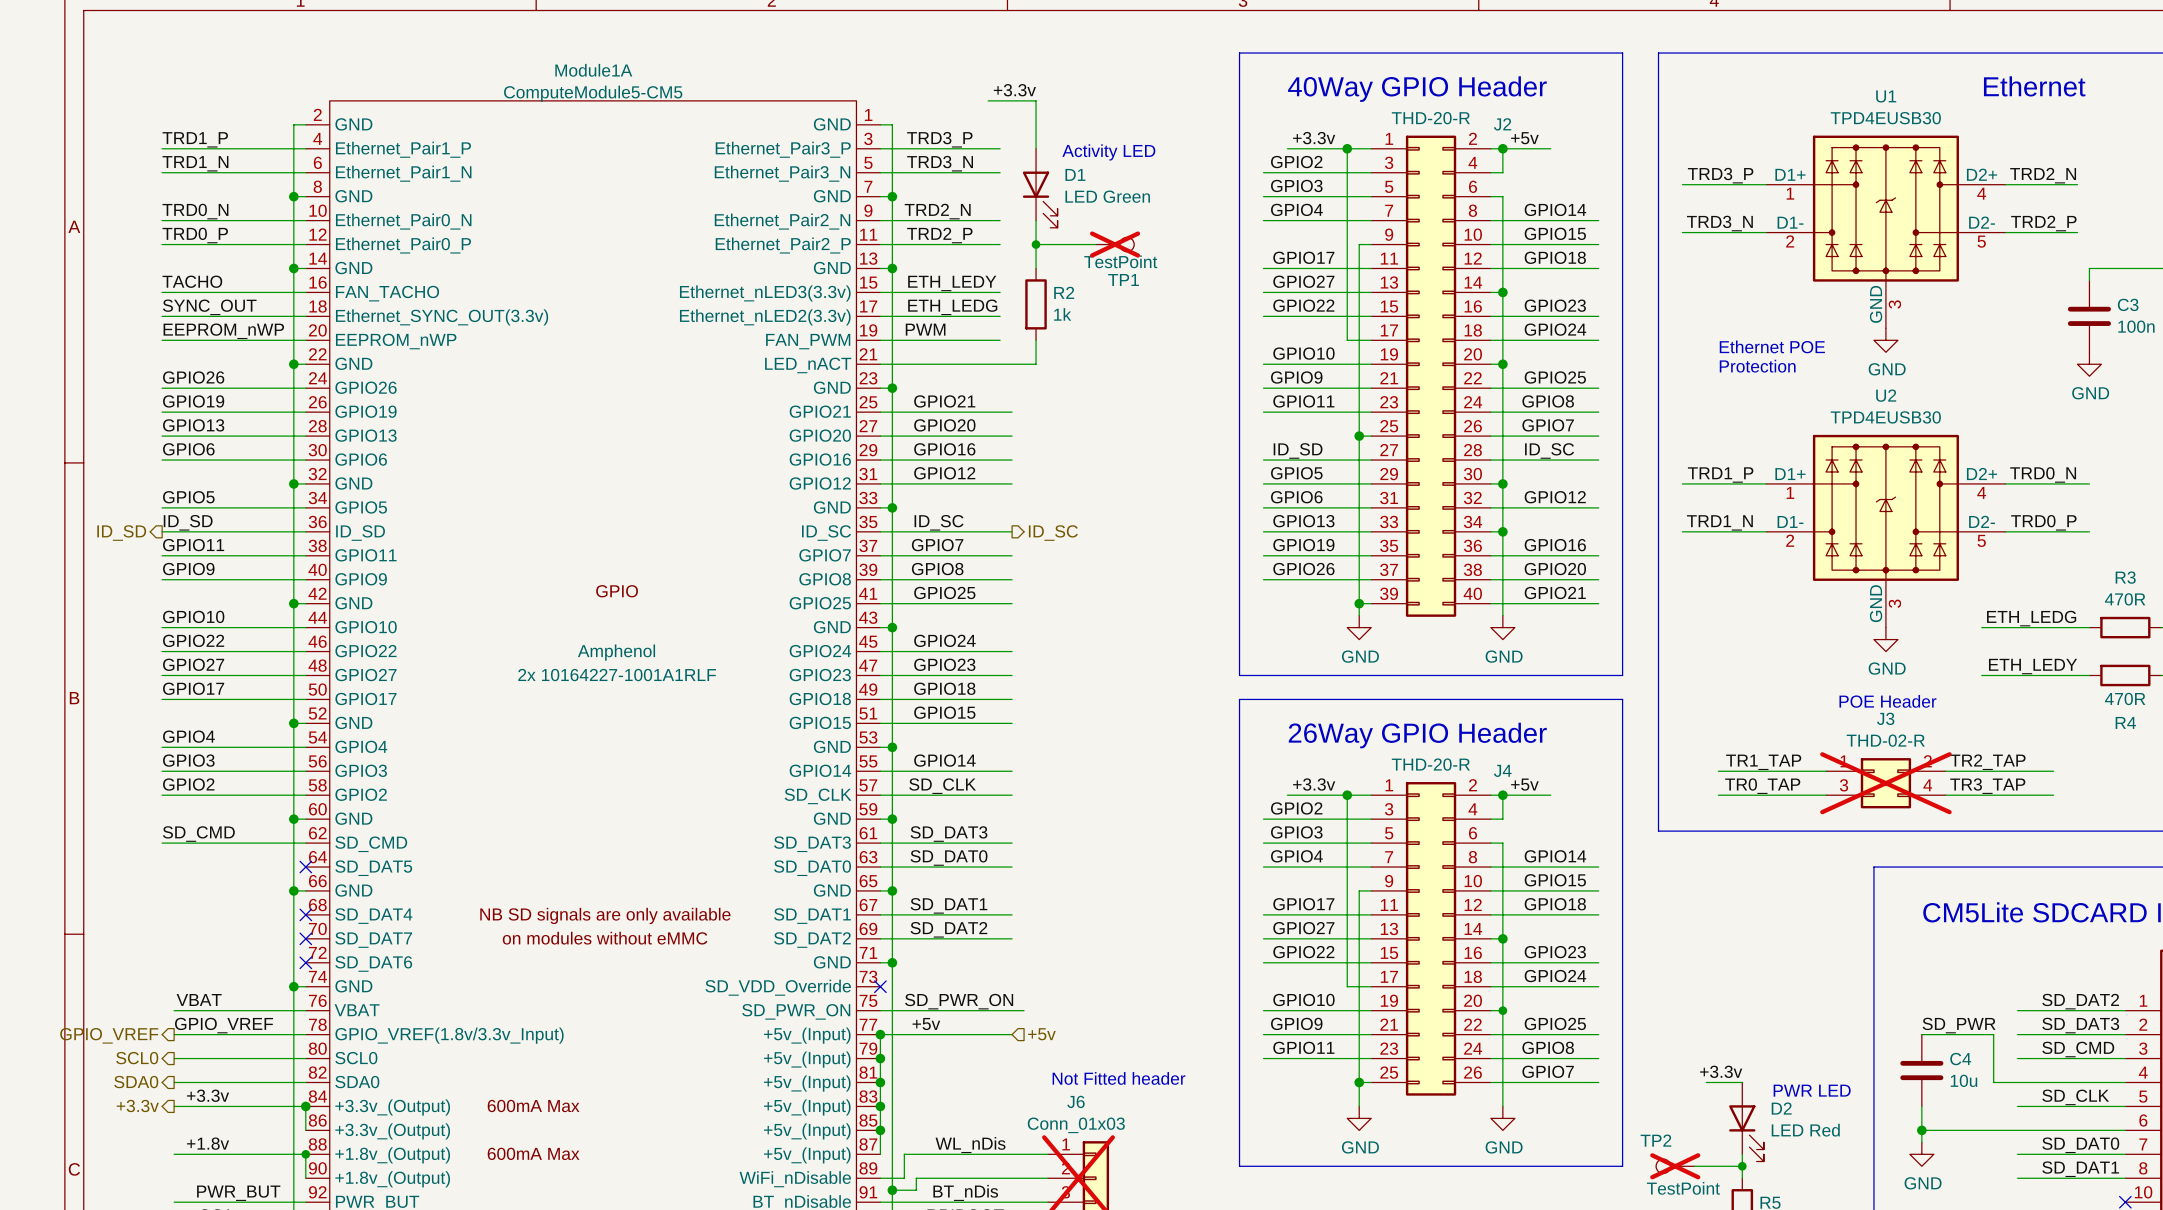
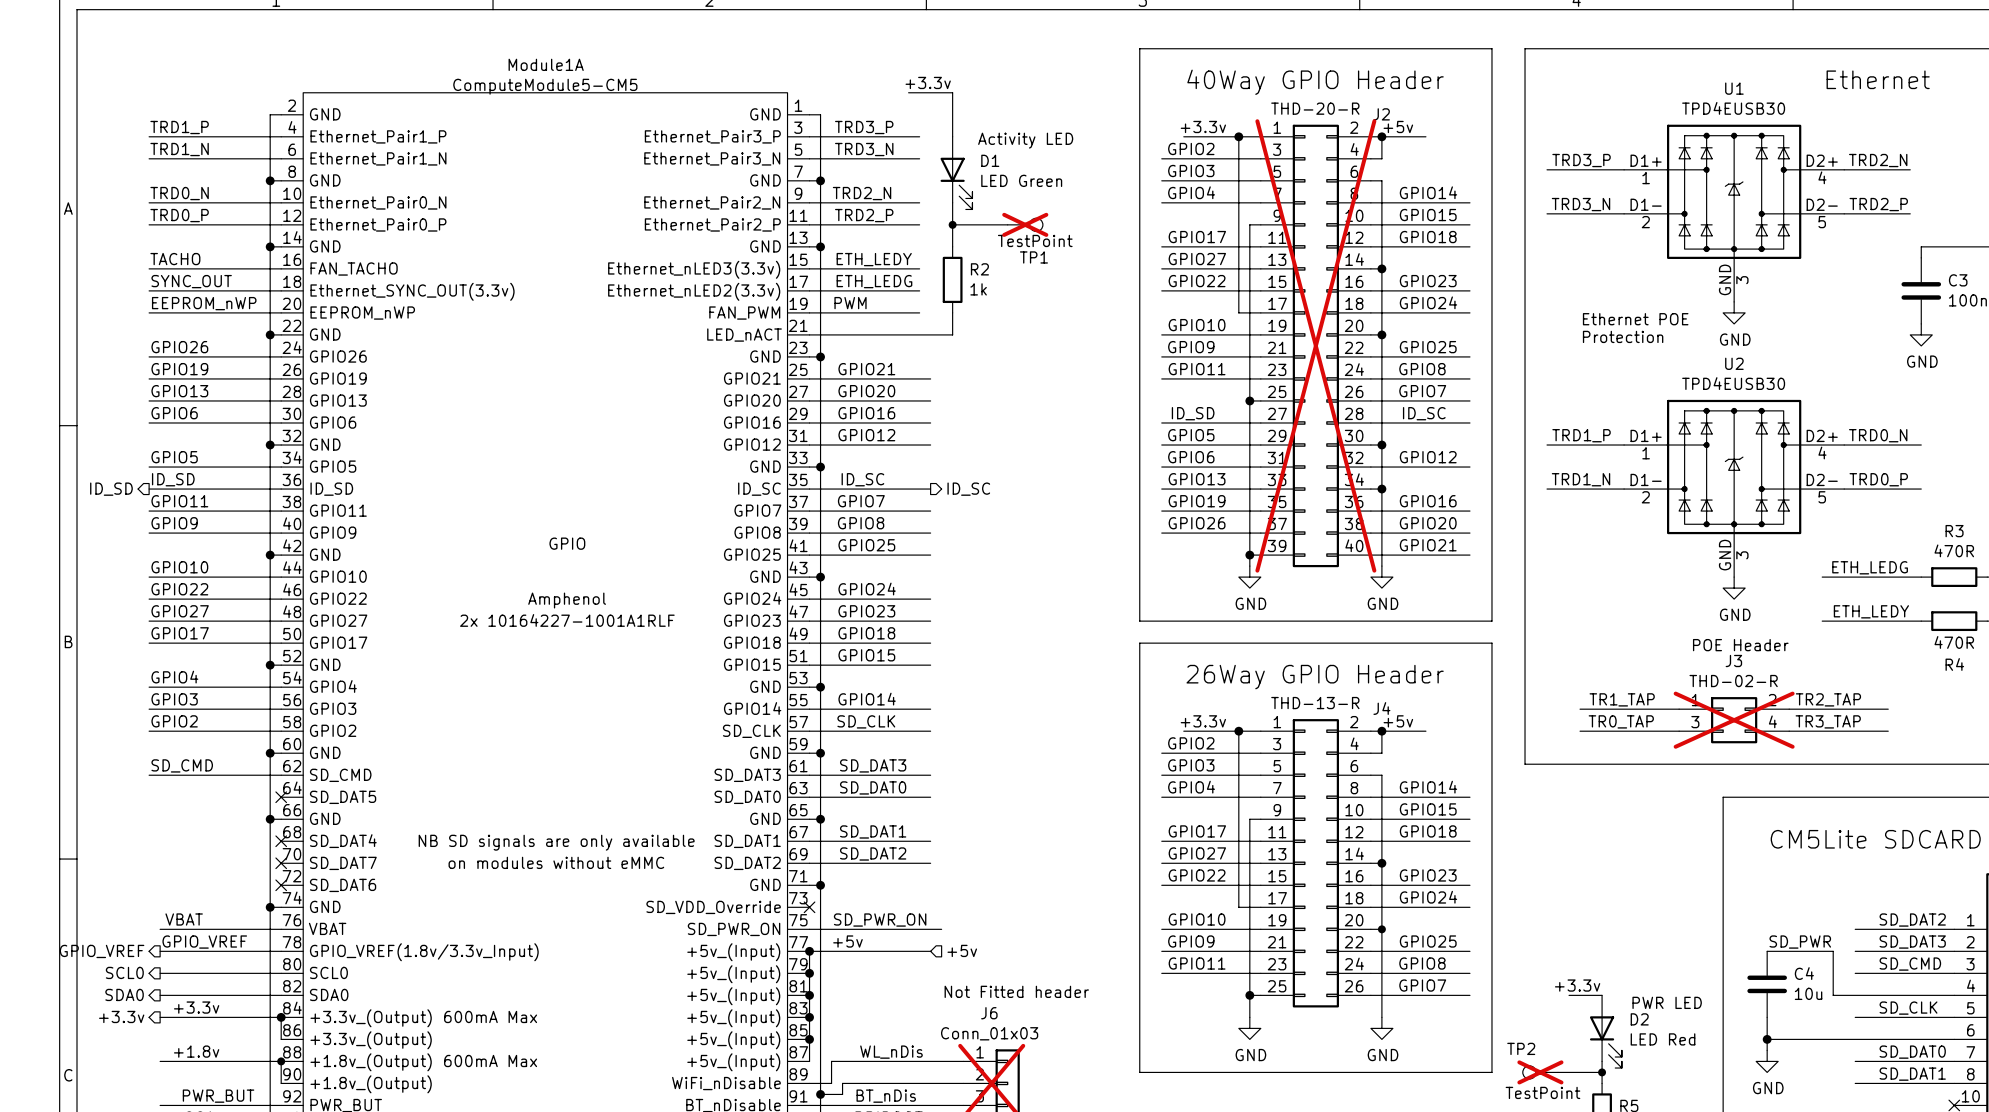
J2 do-not-place cross: none -> (1315, 345)
J4 value: THD-20-R (1430, 764) -> THD-13-R (1315, 703)

